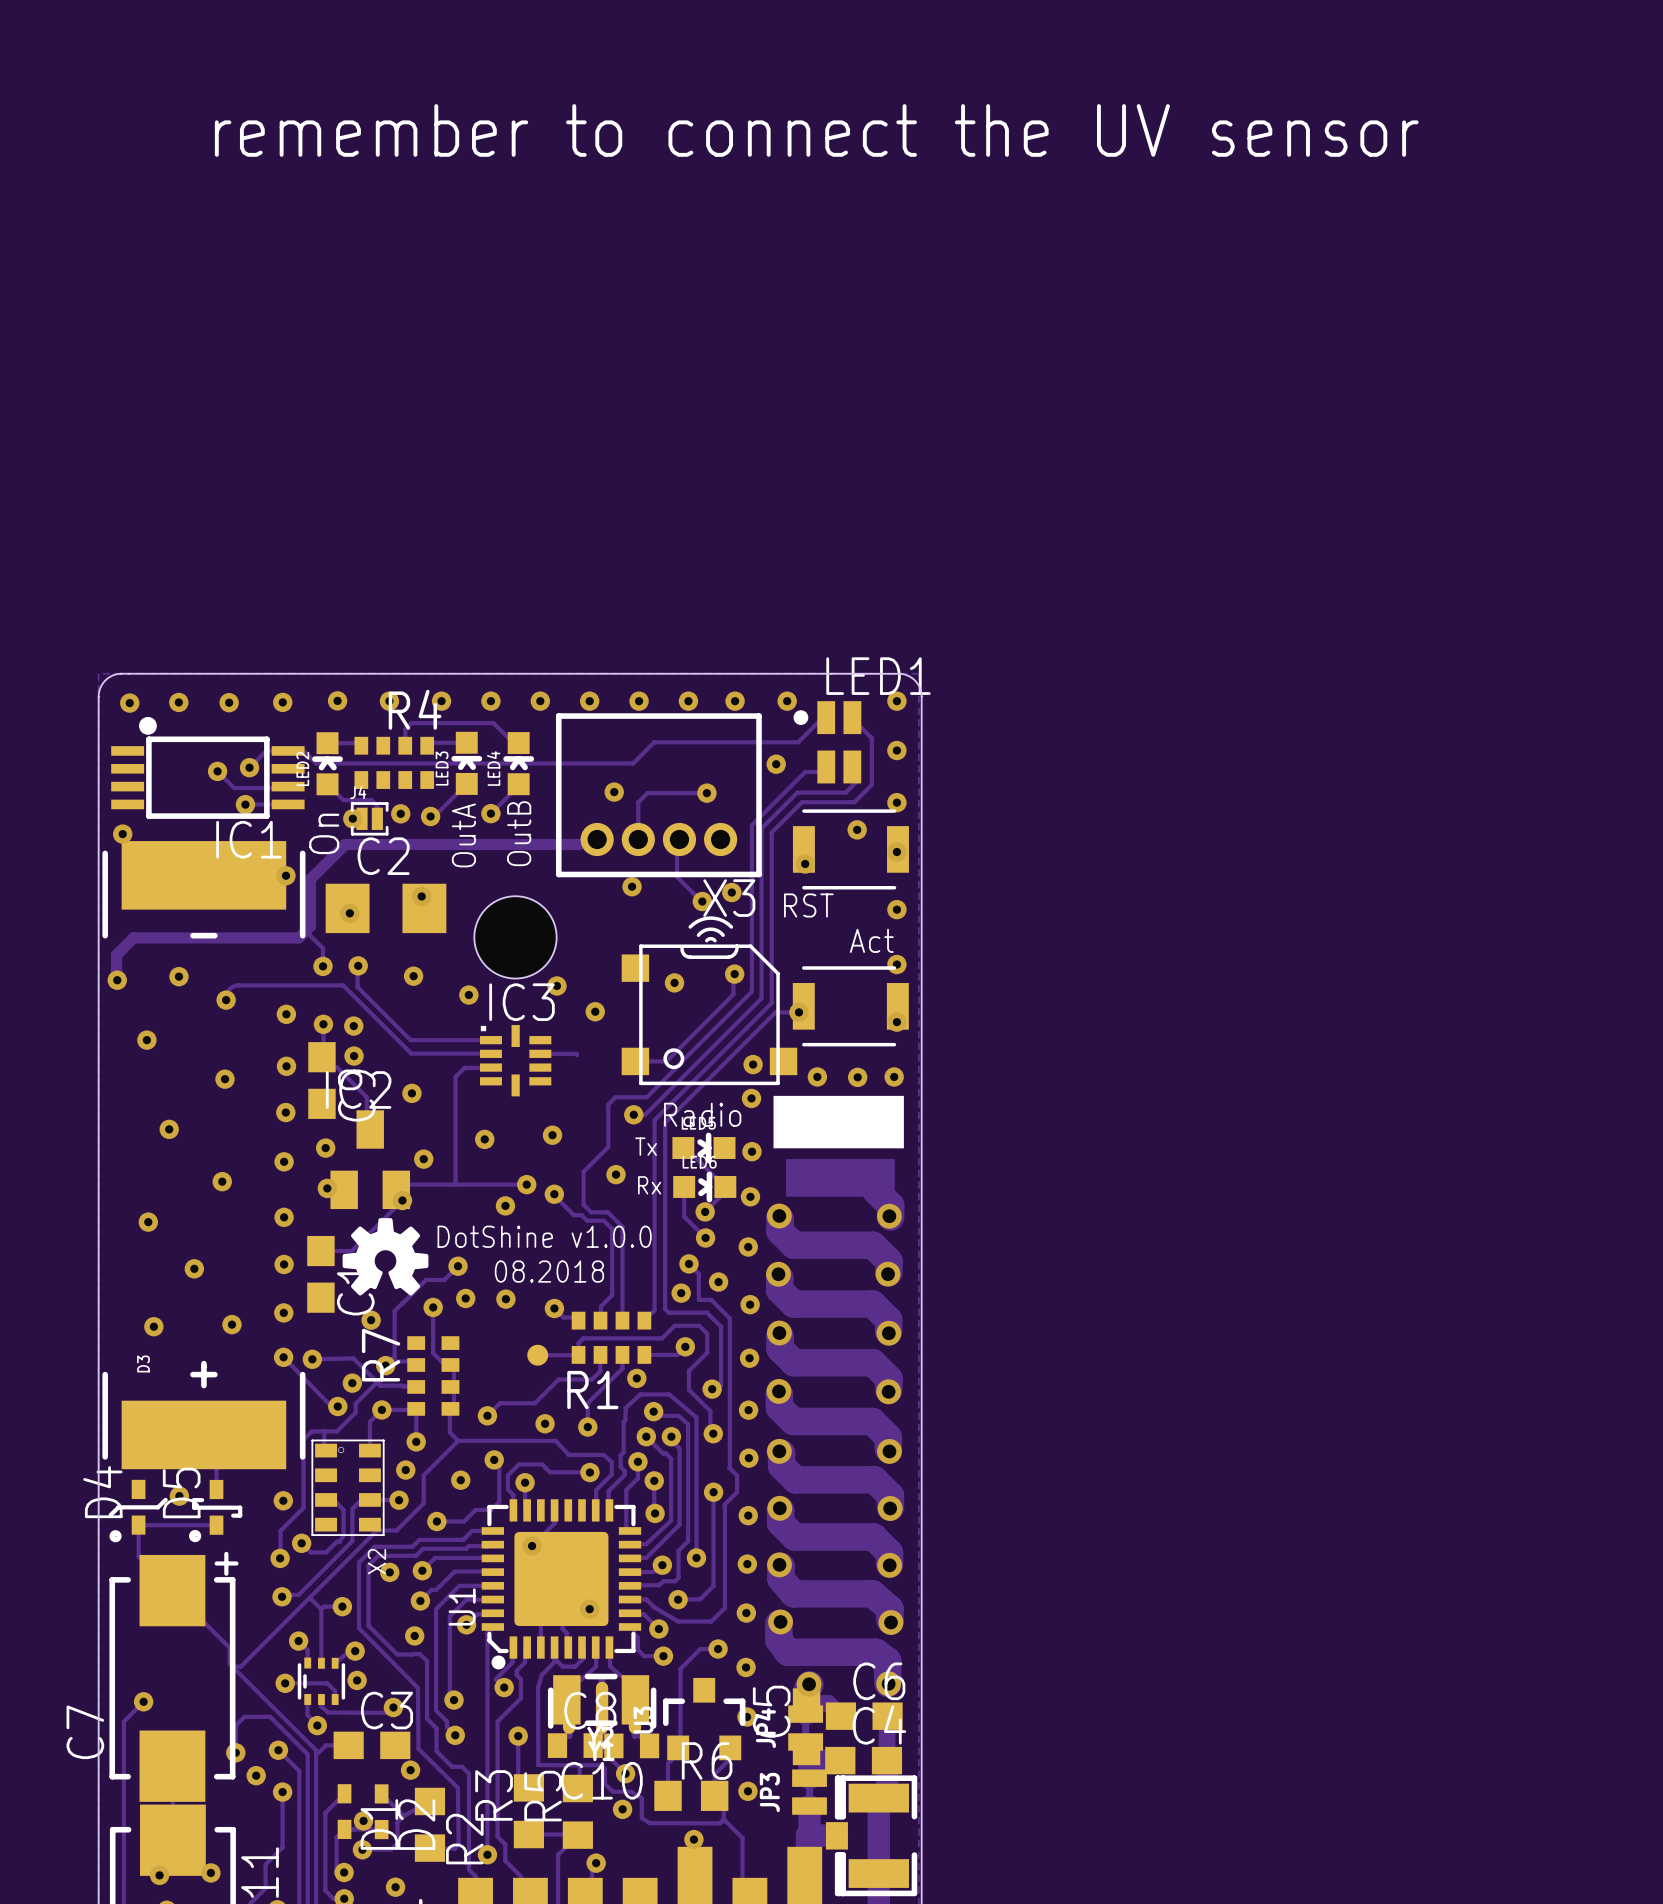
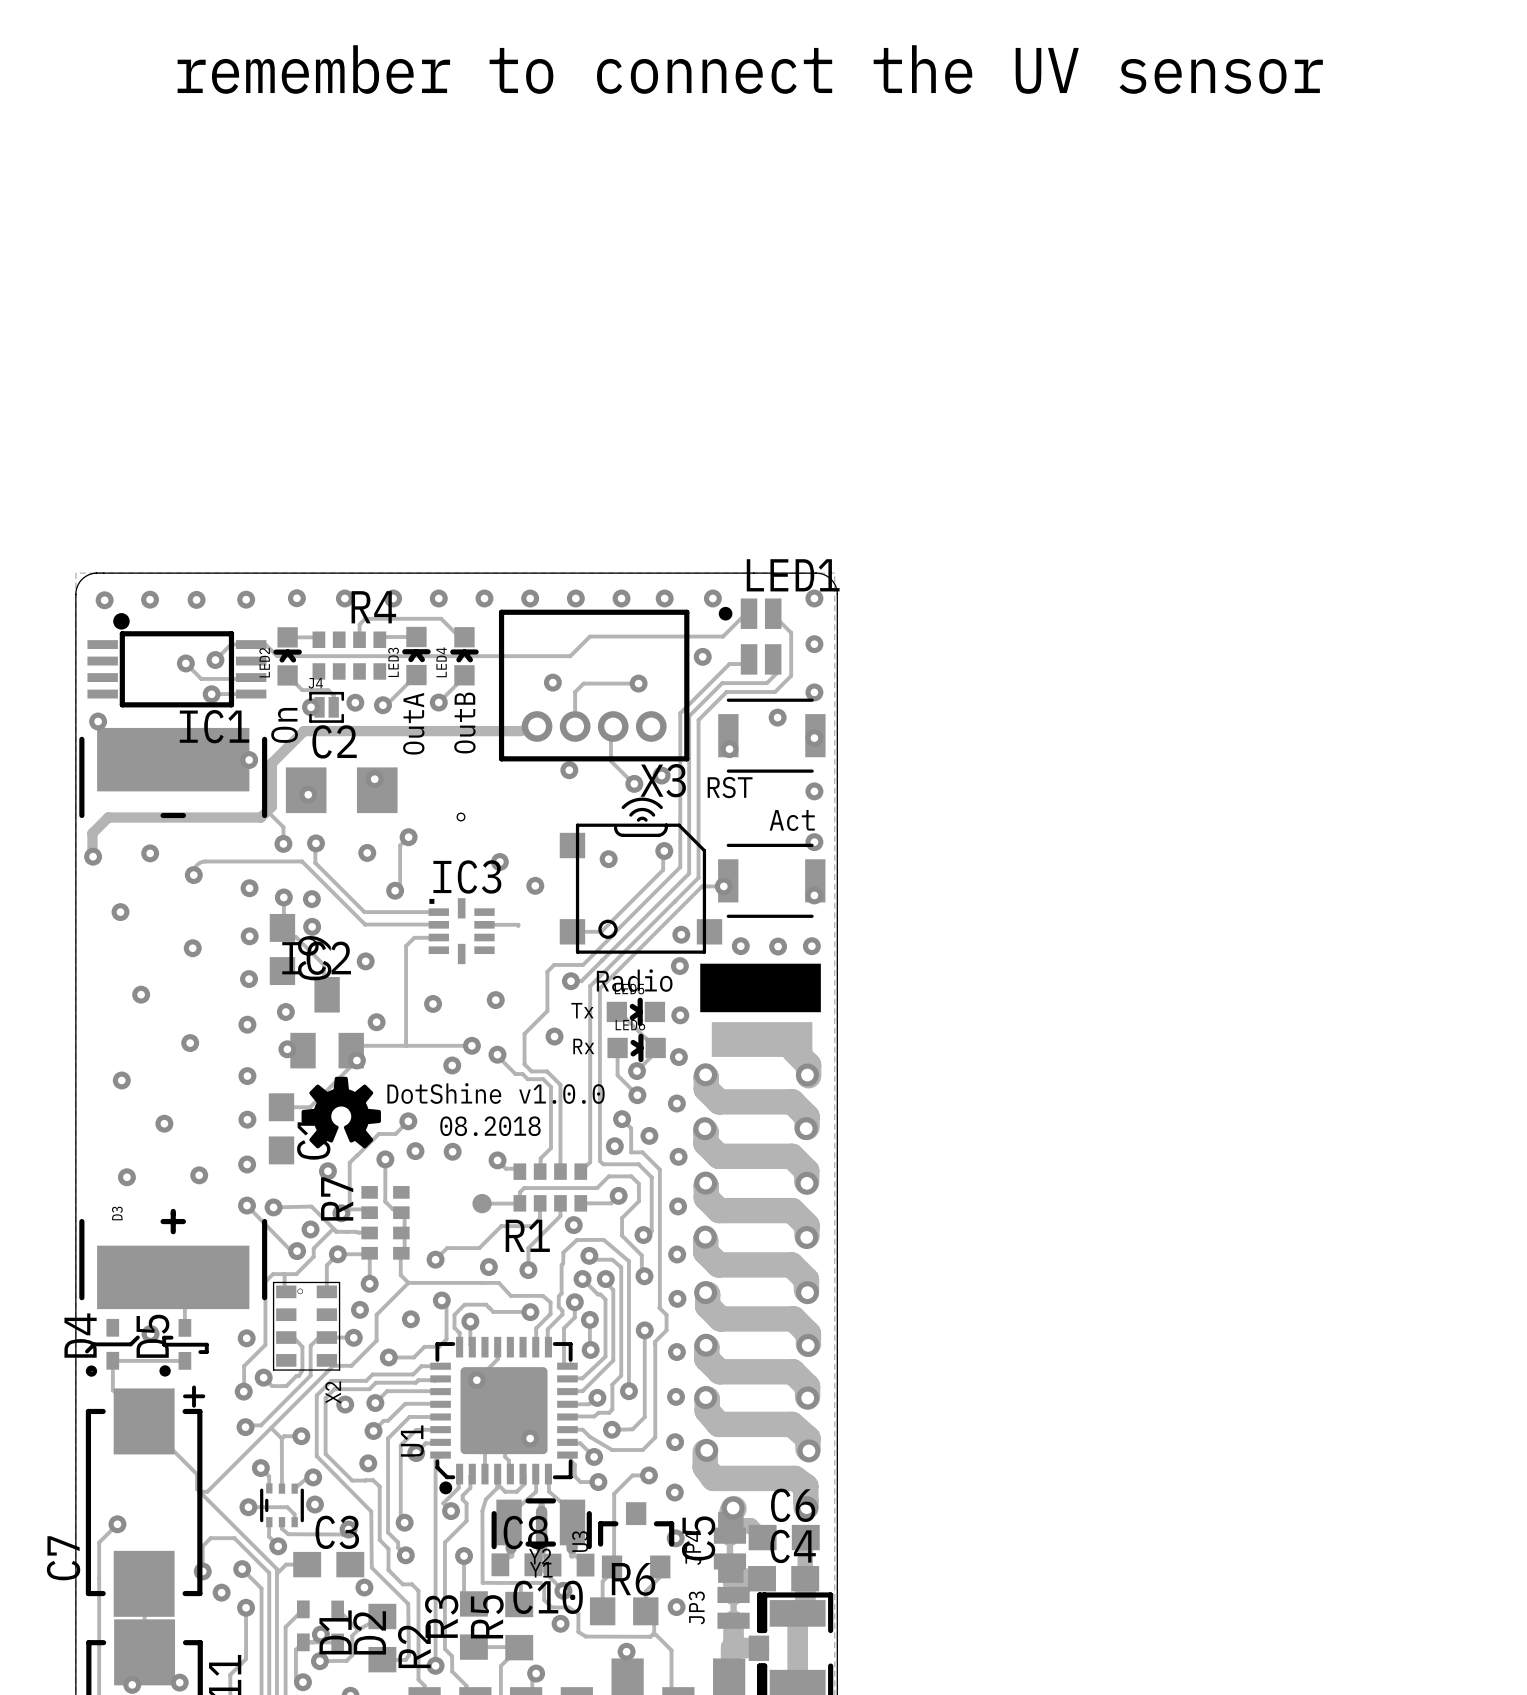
hole size: [474, 896, 557, 979] -> [457, 813, 465, 821]
track: none -> (408, 837) (400, 845) (400, 885) (395, 890)
via: none -> (408, 837)
via: (468, 995) -> none
via: none -> (395, 890)

